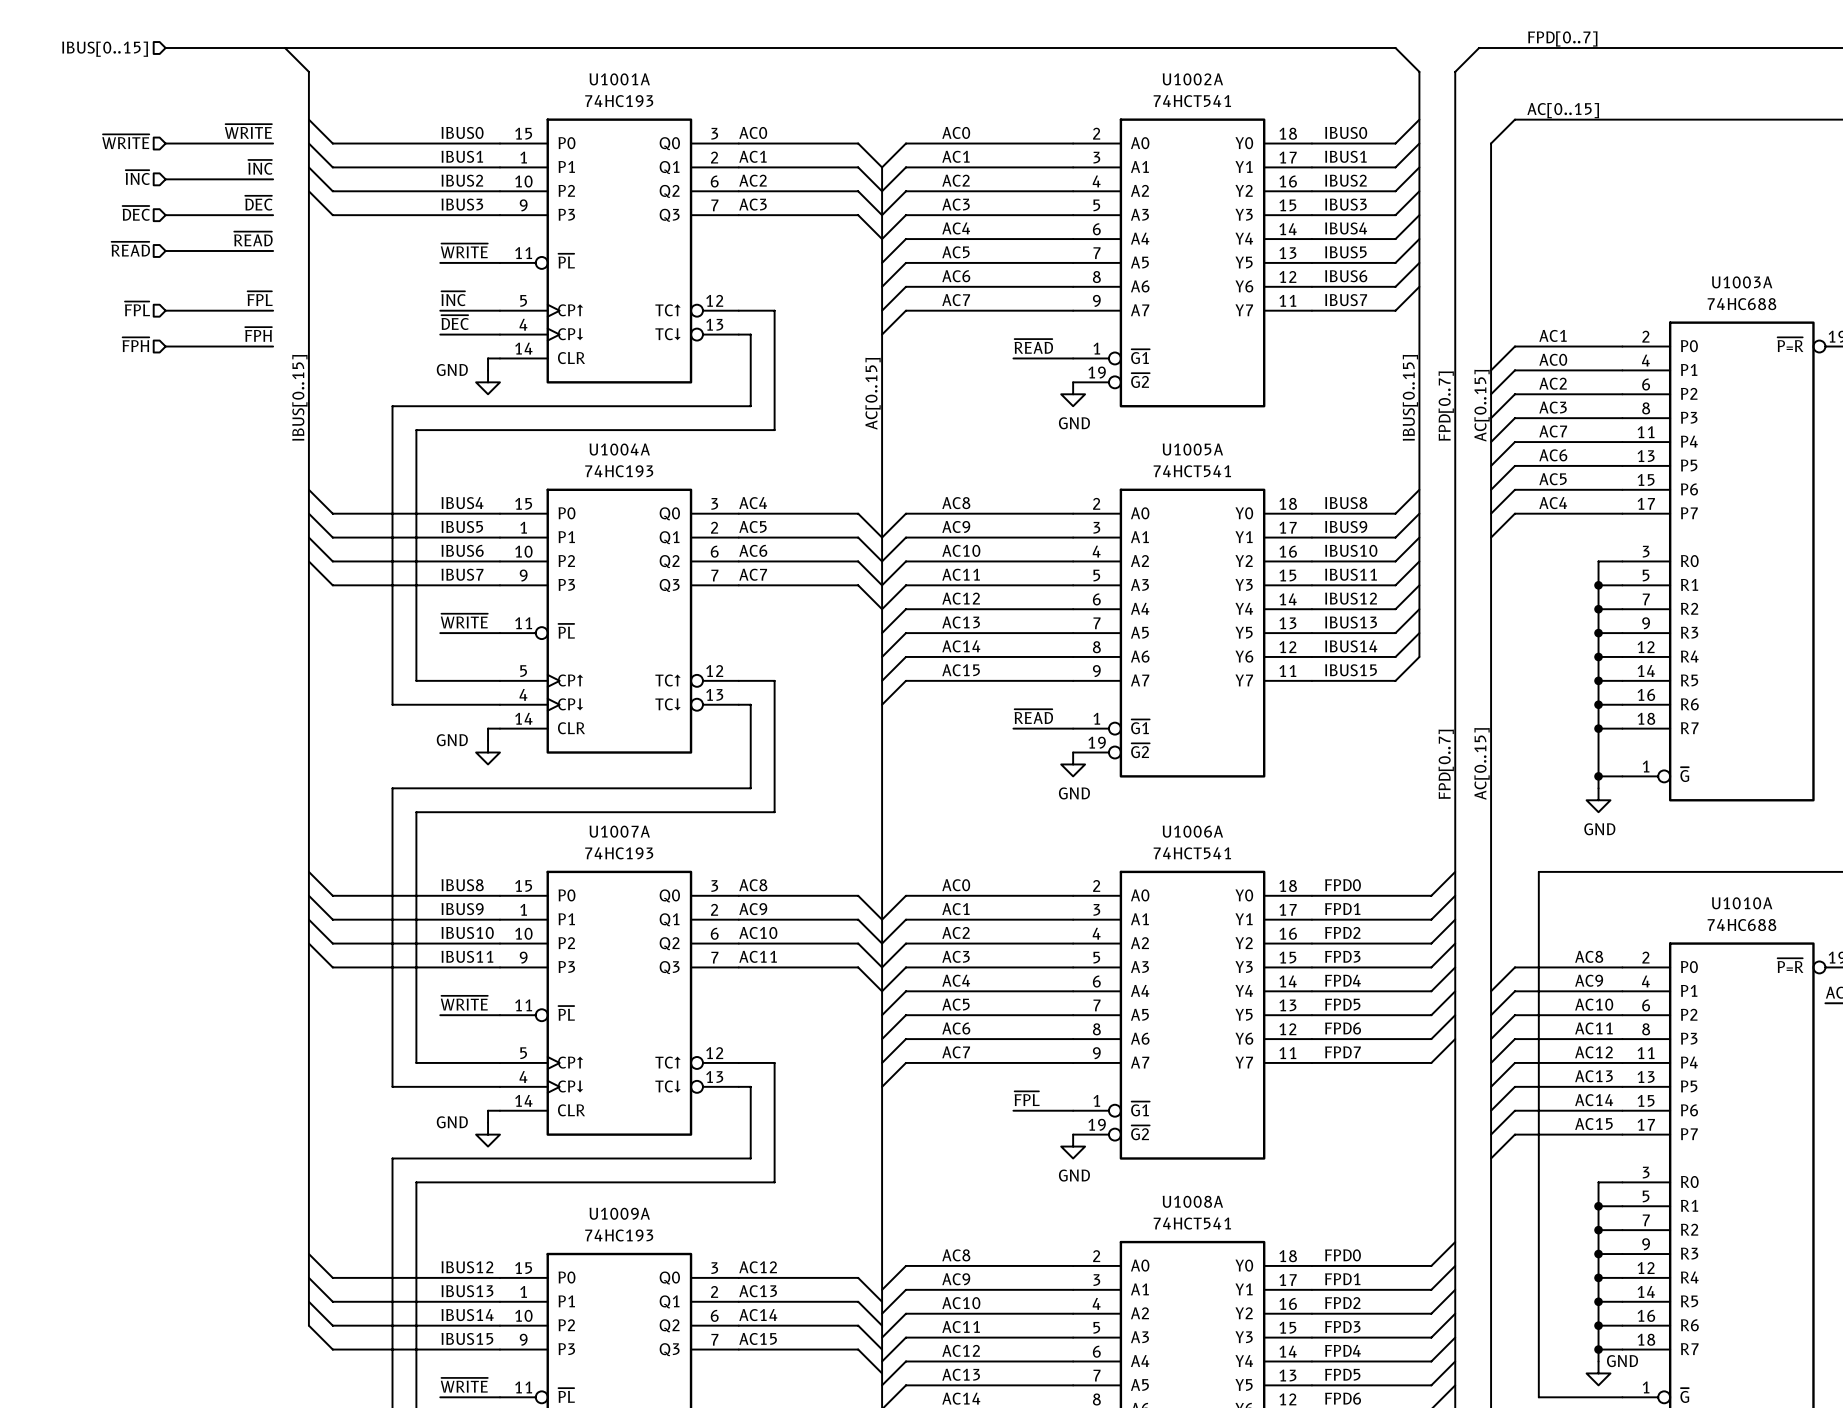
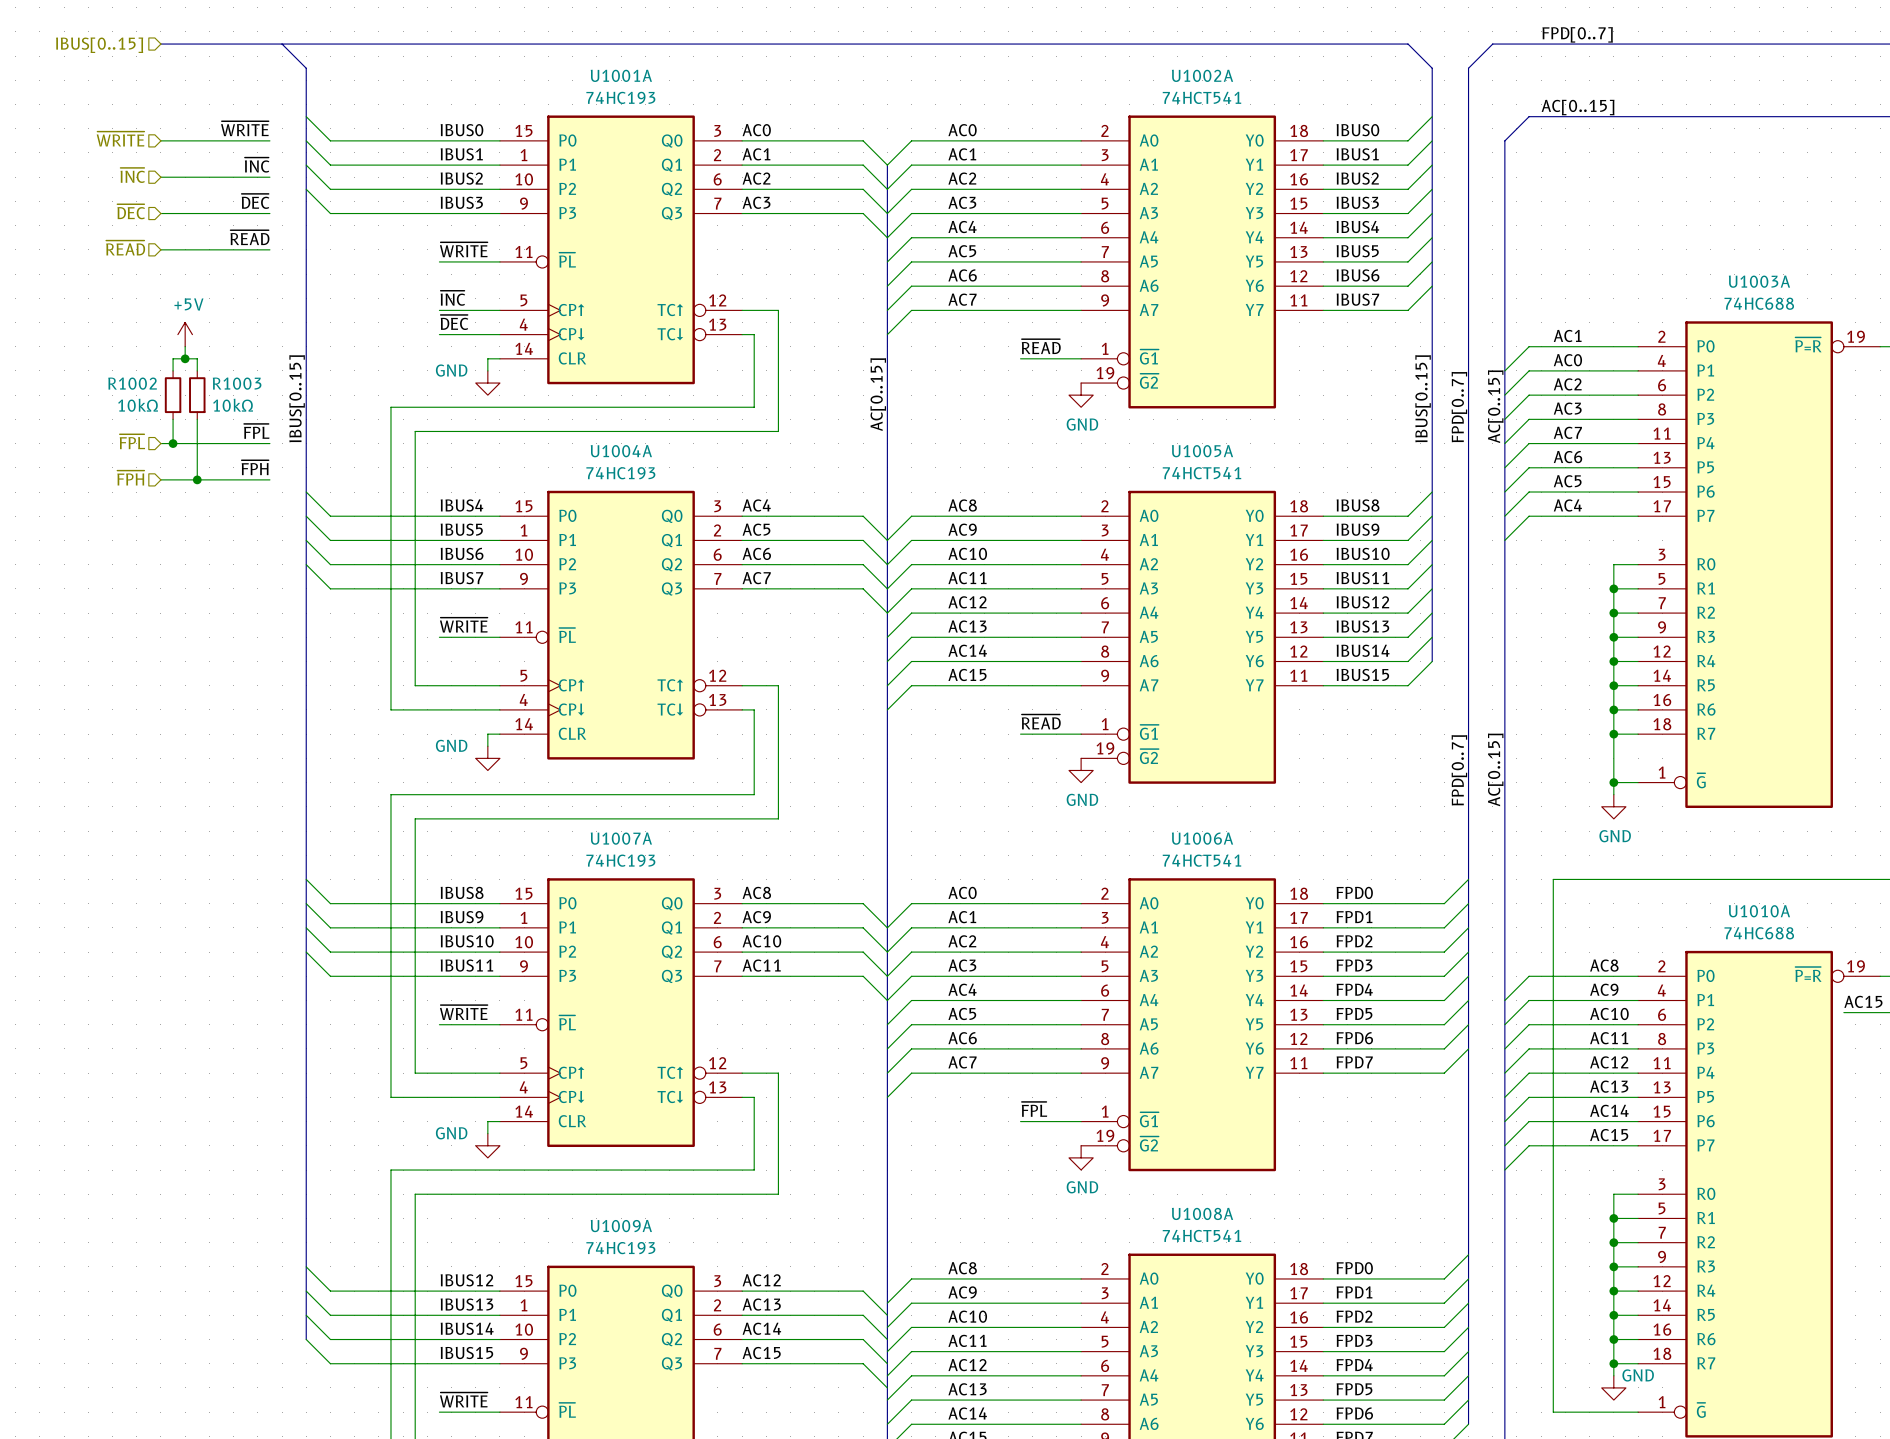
label position: ~{FPL} (260, 298) -> ~{FPL} (256, 431)
hierarchical label position: ~{FPL} (137, 308) -> ~{FPL} (132, 441)
wire: (165, 310) (273, 310) -> (160, 443) (269, 443)
power symbol: none -> +5V (185, 334)
label position: ~{FPH} (258, 334) -> ~{FPH} (255, 467)
hierarchical label position: ~{FPH} (135, 344) -> ~{FPH} (130, 478)
wire: (165, 346) (273, 346) -> (160, 479) (269, 479)
wire: none -> (185, 346) (185, 358)
junction: none -> (185, 358)
wire: none -> (173, 370) (173, 358) (197, 358) (197, 370)
R1002: none -> 10kΩ (173, 395)
R1003: none -> 10kΩ (197, 395)
wire: none -> (173, 419) (173, 443)
wire: none -> (197, 419) (197, 479)
junction: none -> (173, 443)
junction: none -> (197, 479)

